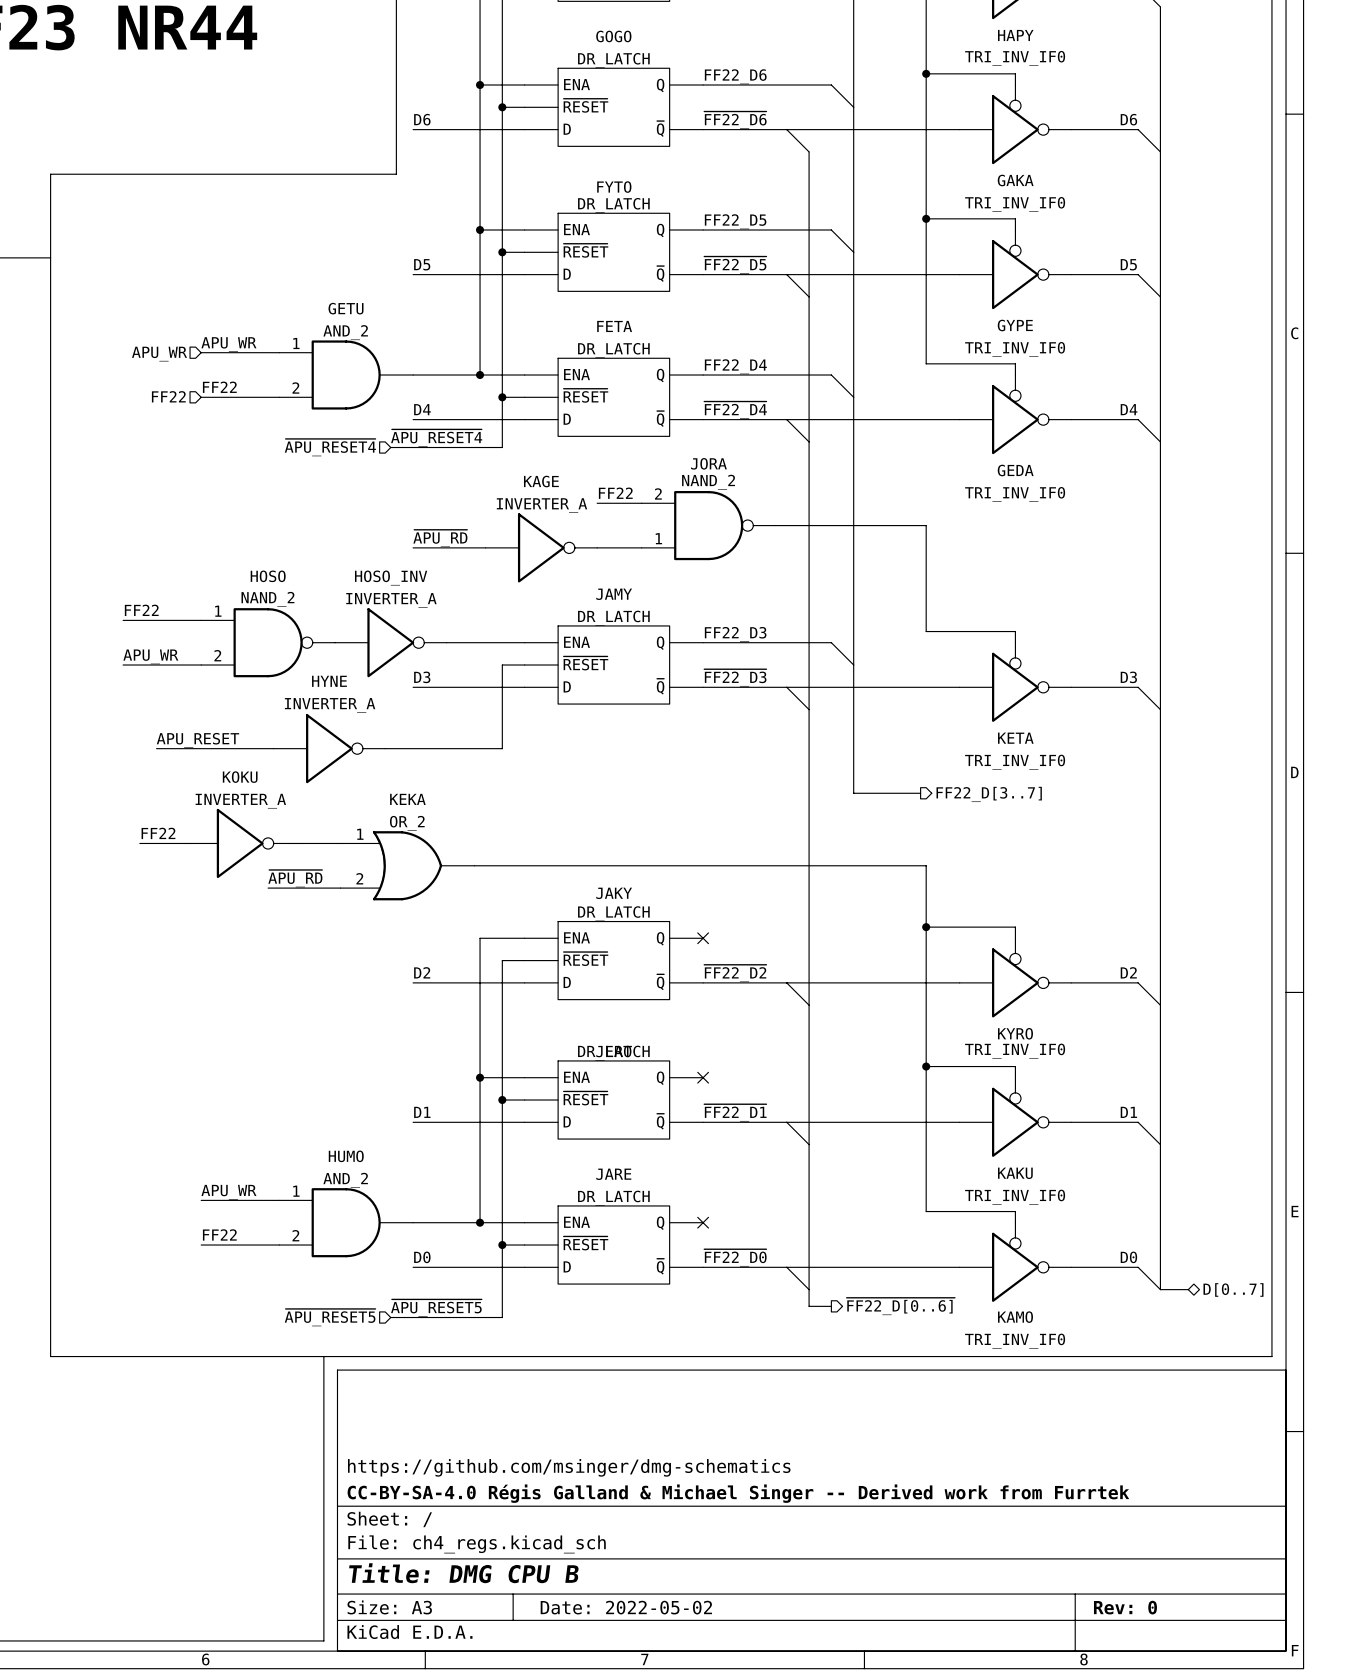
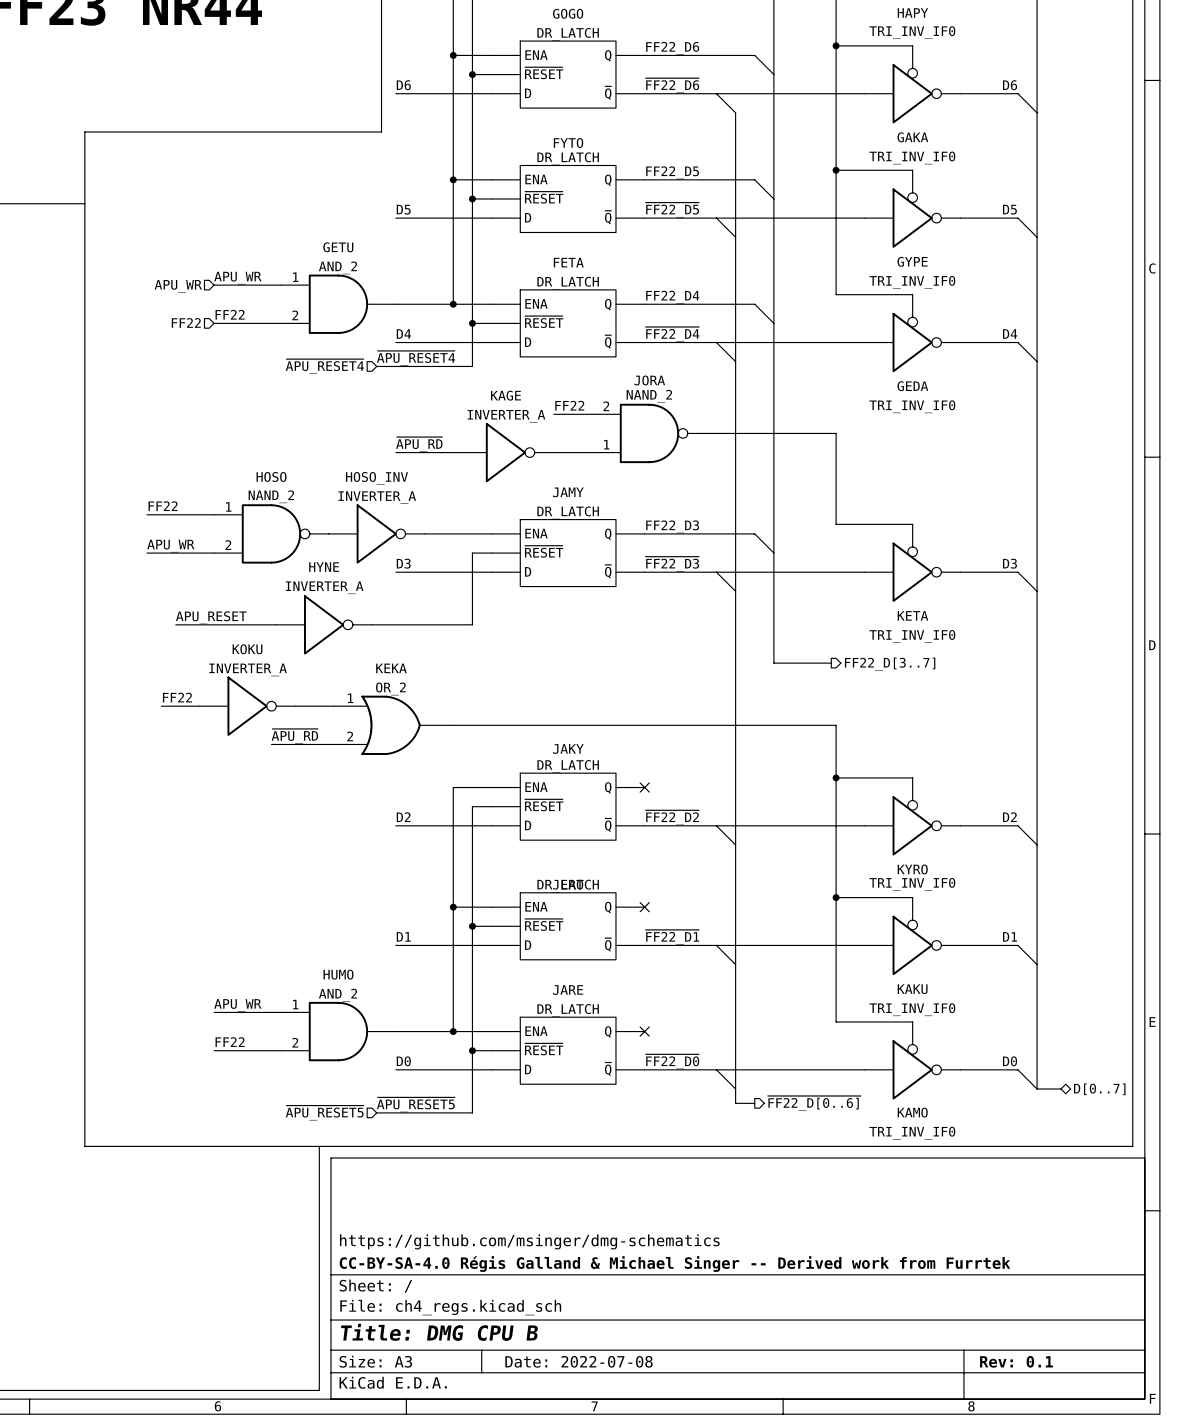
title block: Date: 2022-05-02 (626, 1607) -> Date: 2022-07-08 (579, 1361)
title block: Rev: 0 (1125, 1607) -> Rev: 0.1 (1016, 1361)

